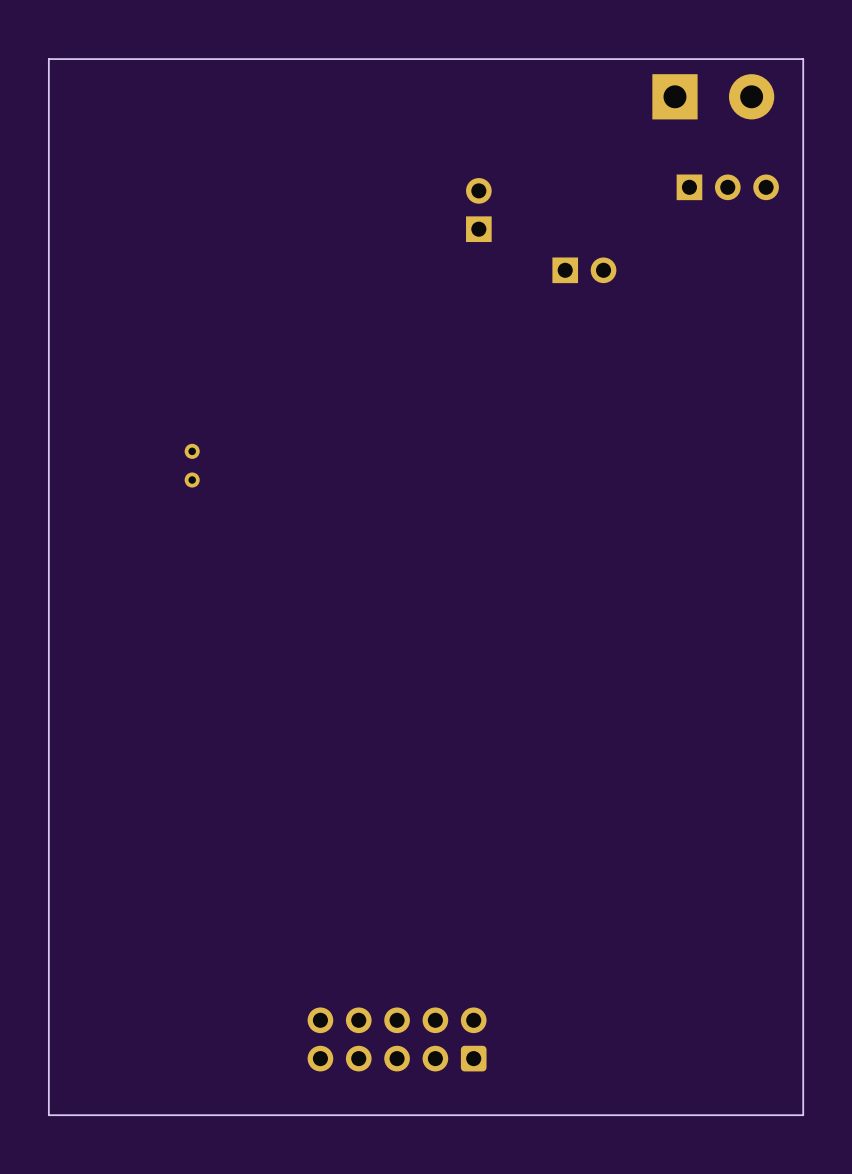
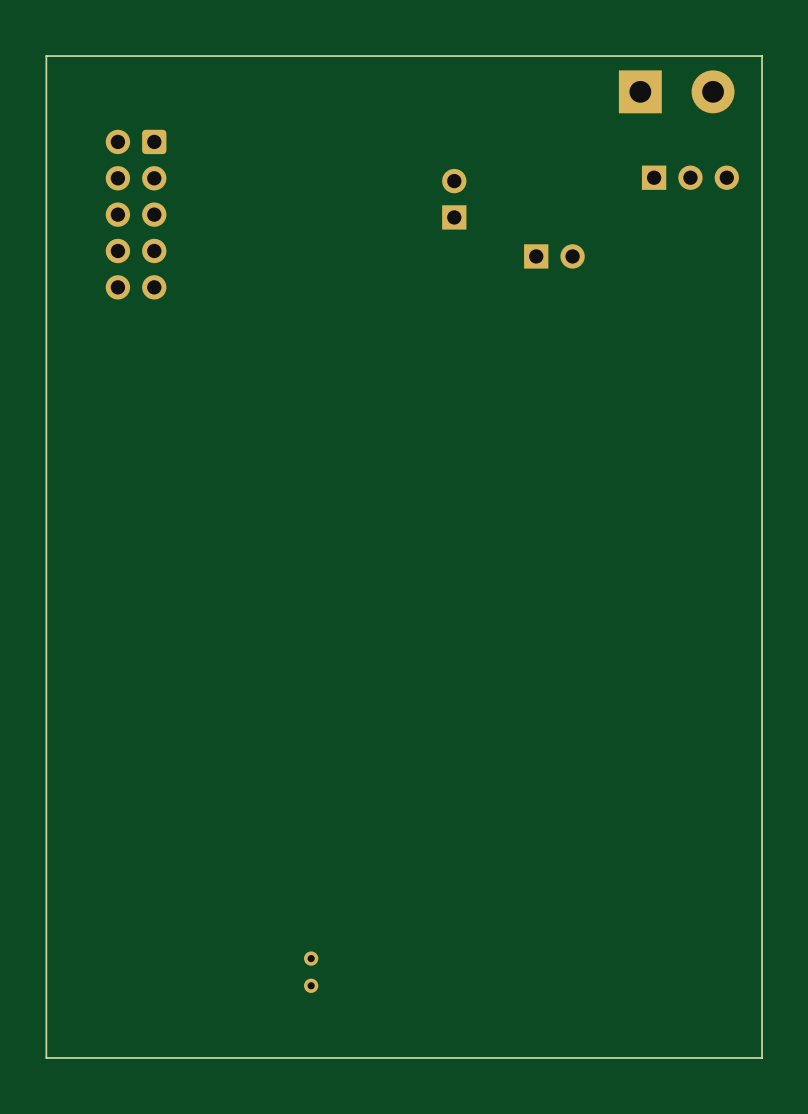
part: none -> (136, 214)
part: (192, 465) -> none
part: none -> (311, 972)
part: (397, 1039) -> none

